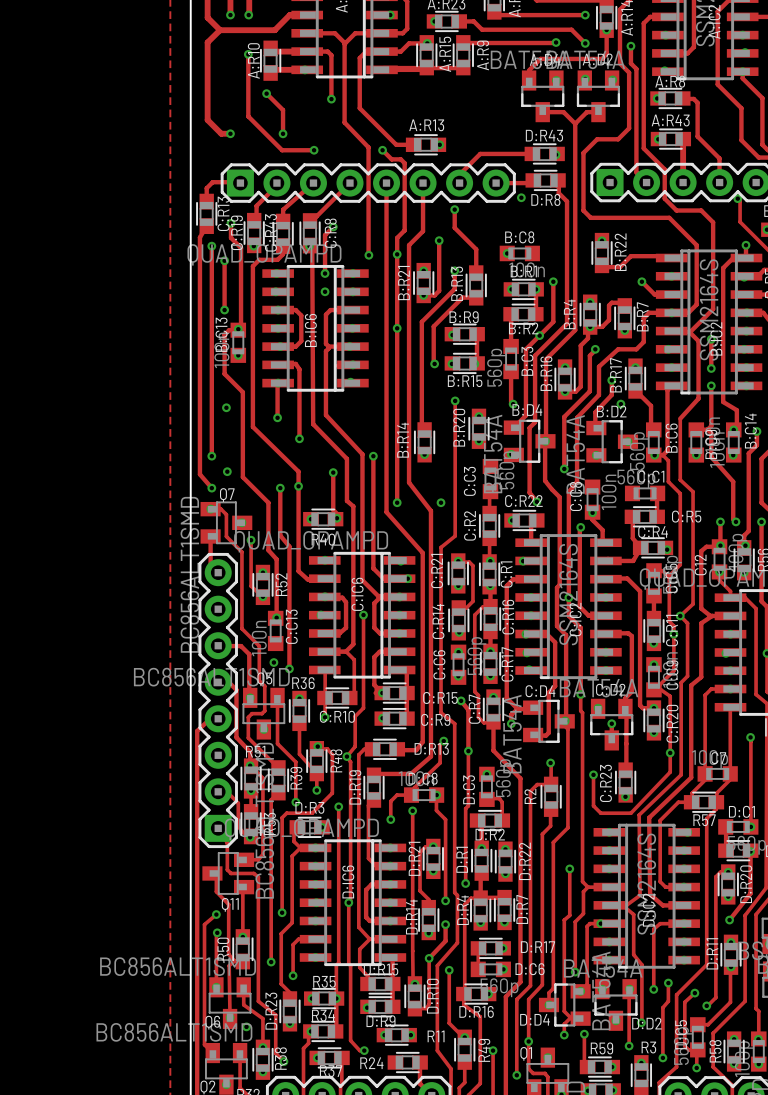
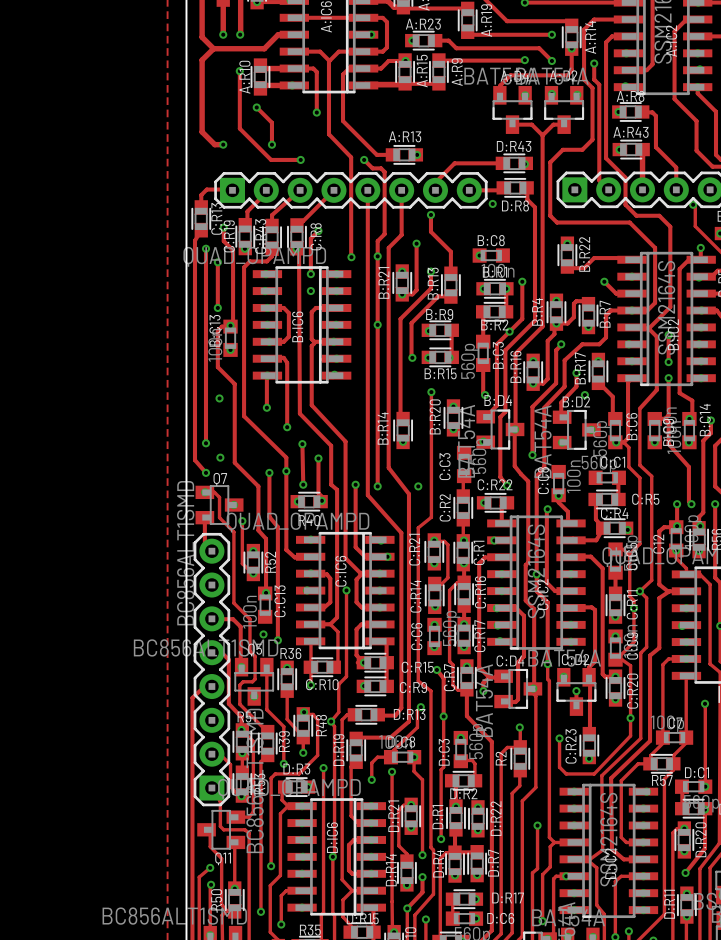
track: (373, 456) (373, 500) -> none
via: (373, 456) -> none
track: none -> (302, 444) (303, 484)
via: none -> (302, 444)
via: none -> (303, 484)
via: none -> (355, 484)

